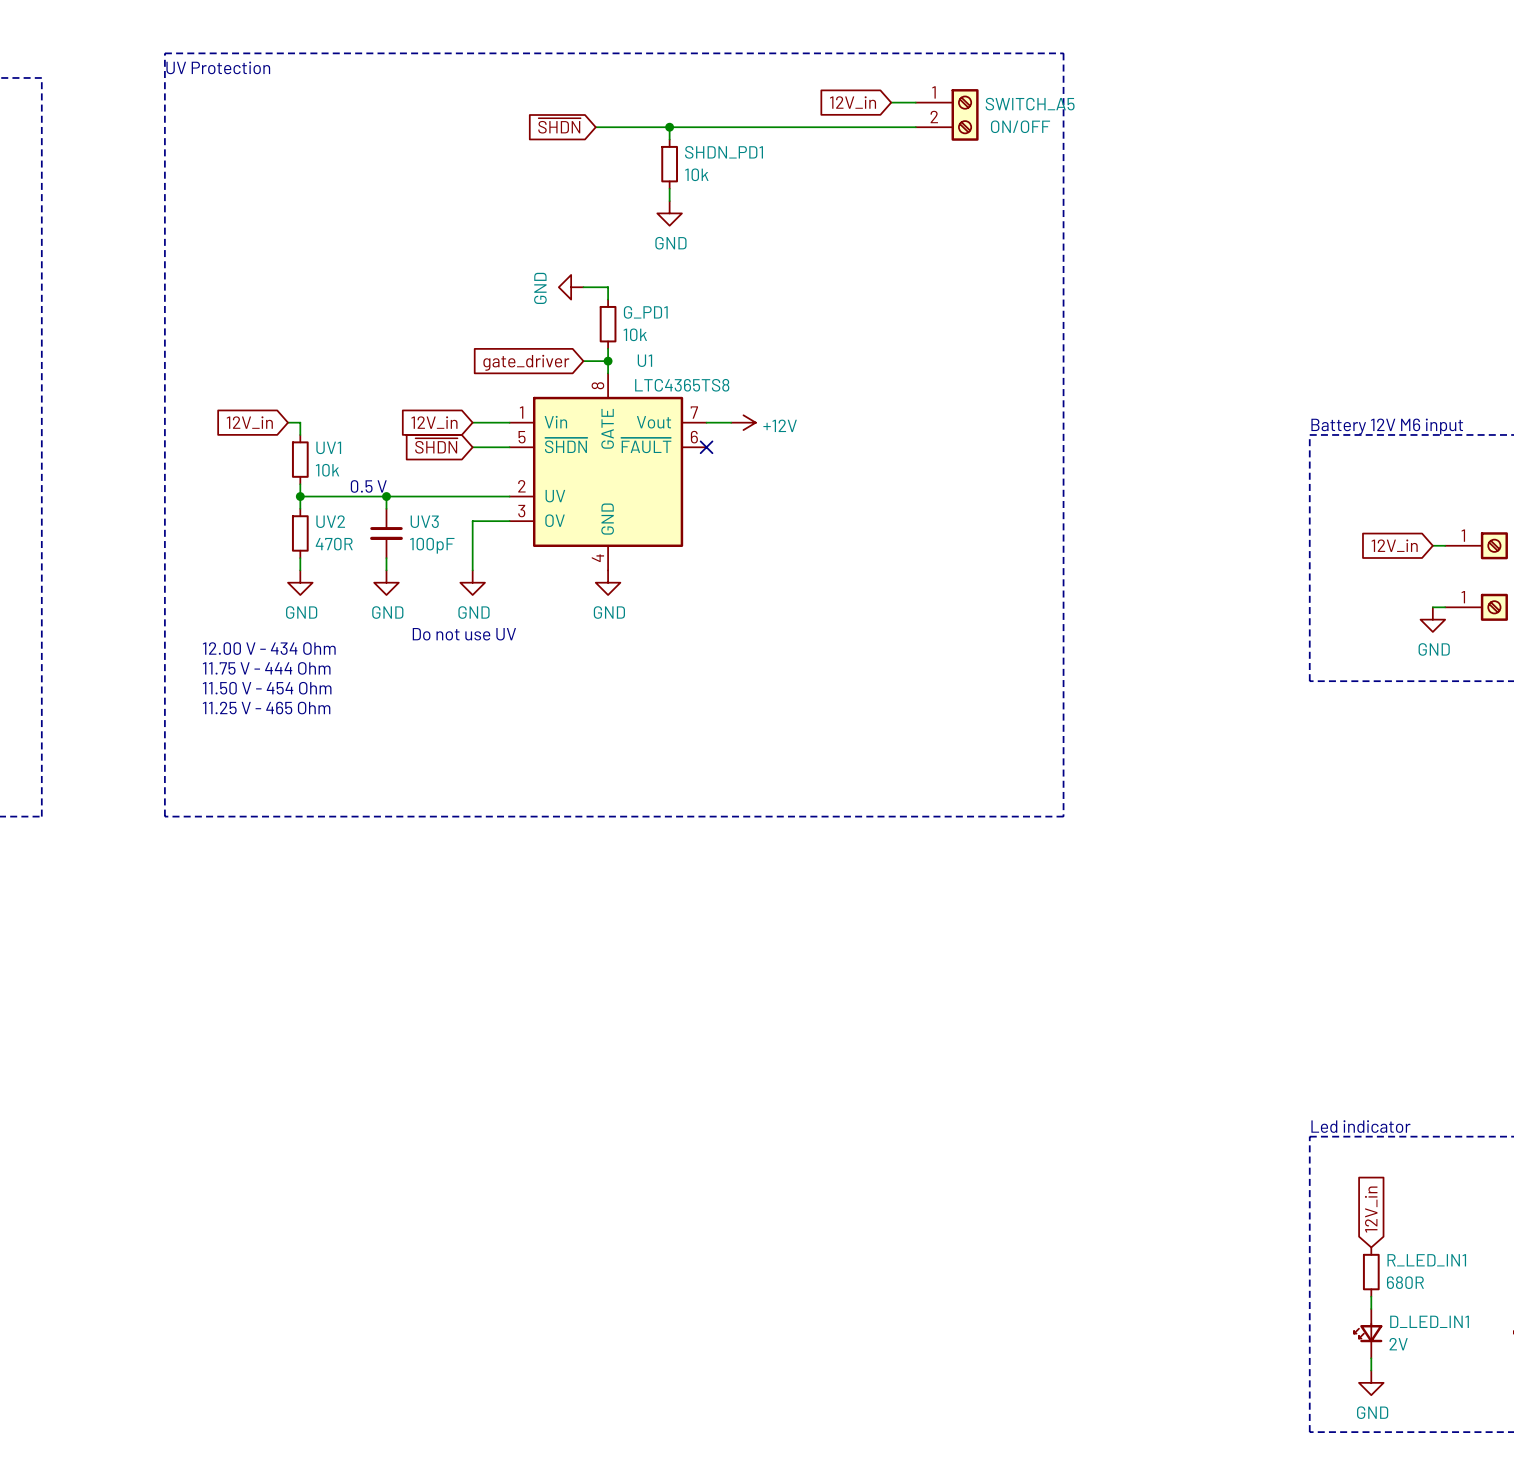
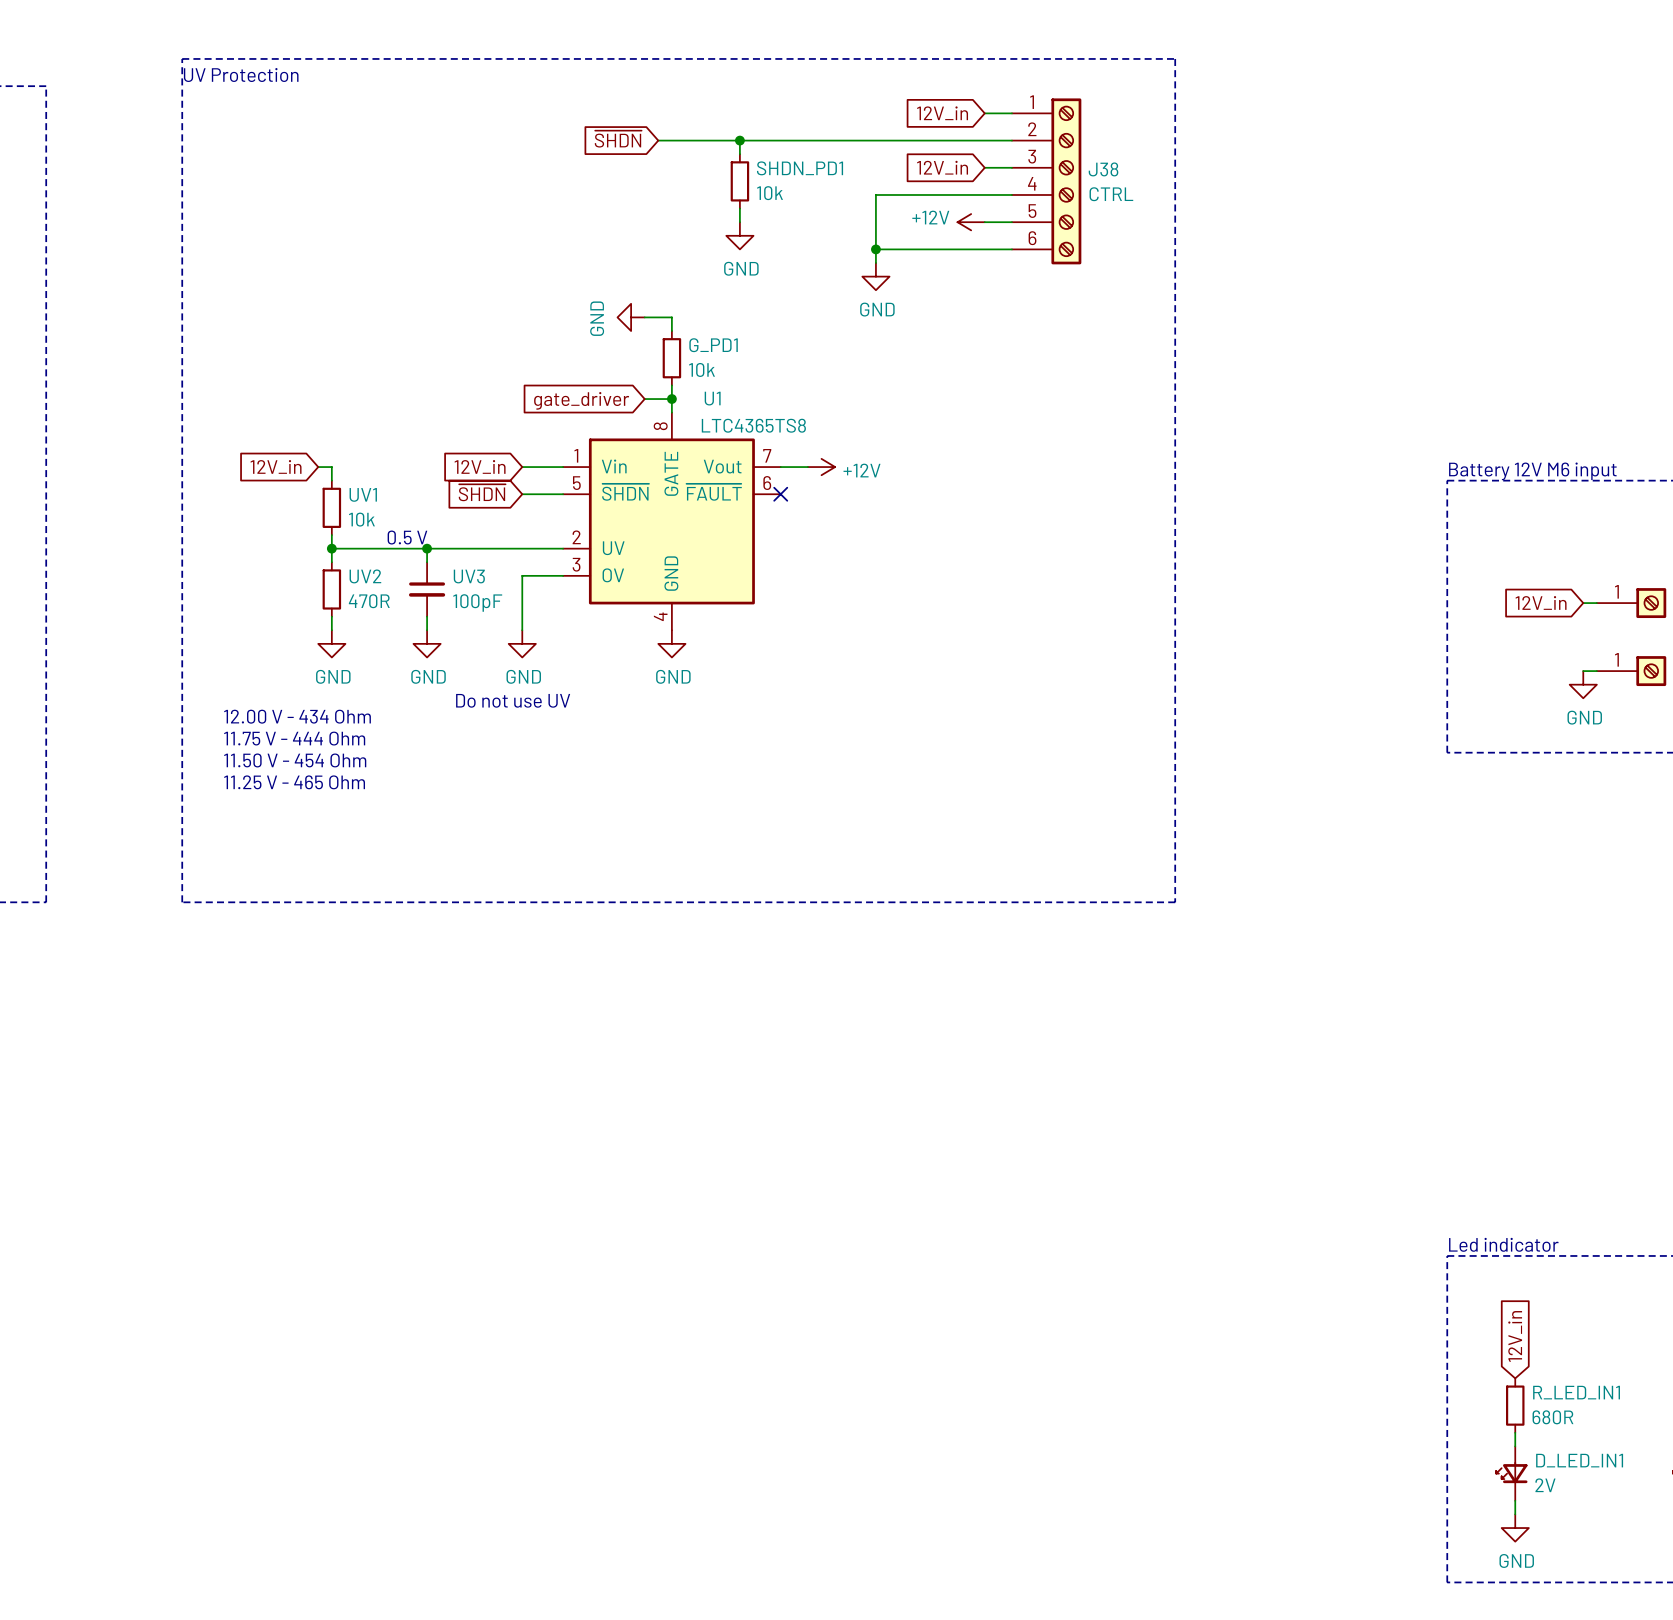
SWITCH_A5: ON/OFF (947, 114) -> none
global label: none -> 12V_in (942, 167)
wire: none -> (984, 167) (1011, 167)
J38: none -> CTRL (1046, 181)
wire: none -> (1011, 194) (875, 194) (875, 263)
power symbol: none -> +12V (971, 222)
wire: none -> (984, 222) (1011, 222)
wire: none -> (875, 249) (1011, 249)
junction: none -> (875, 249)
power symbol: none -> GND (875, 276)

